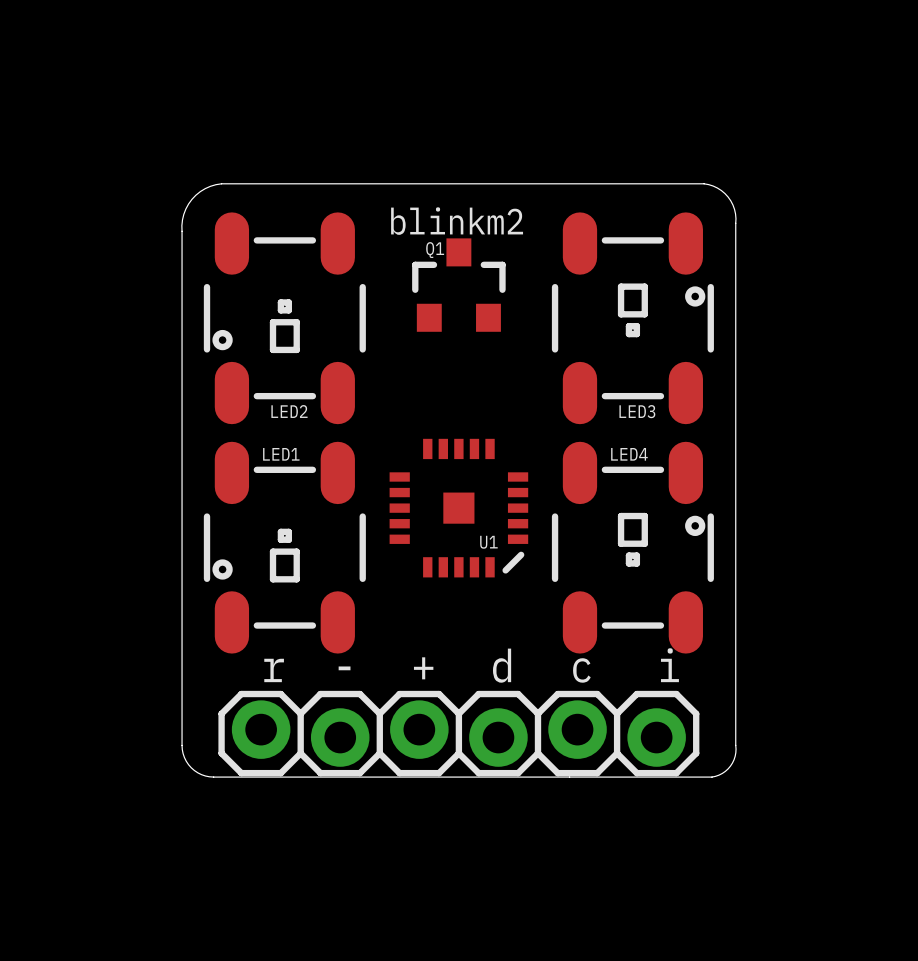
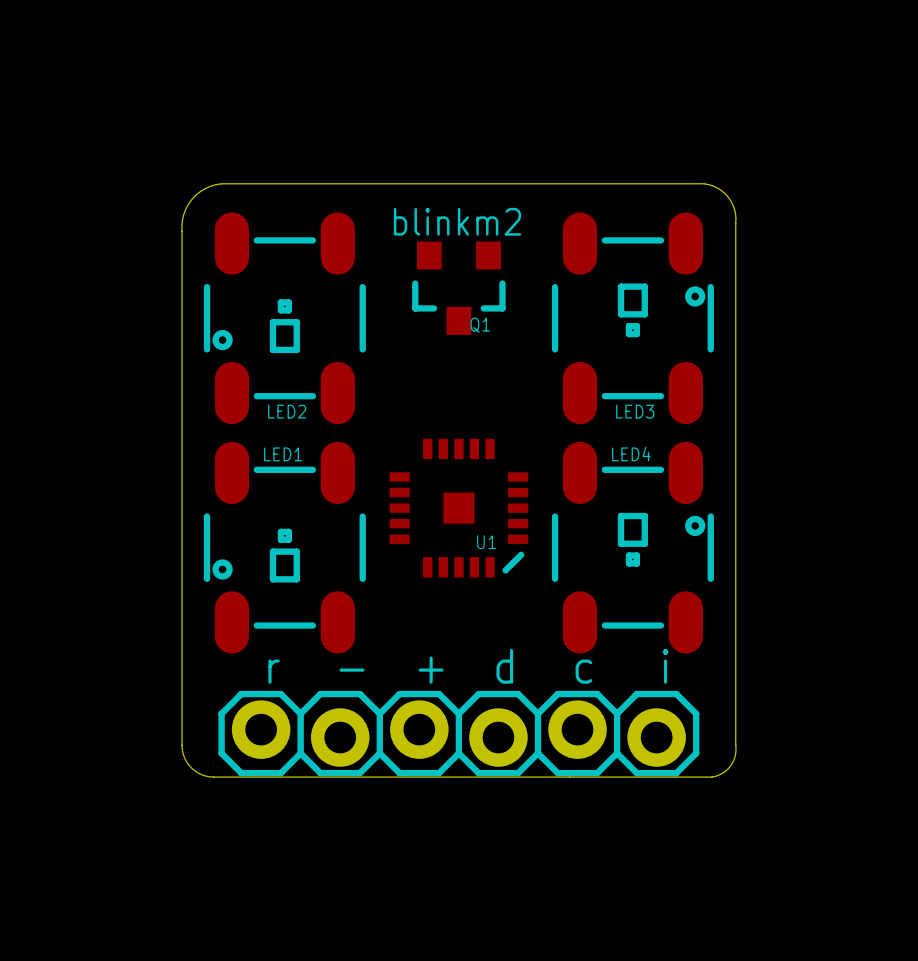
Q1 rotation: 0° (458, 285) -> 180° (458, 288)

